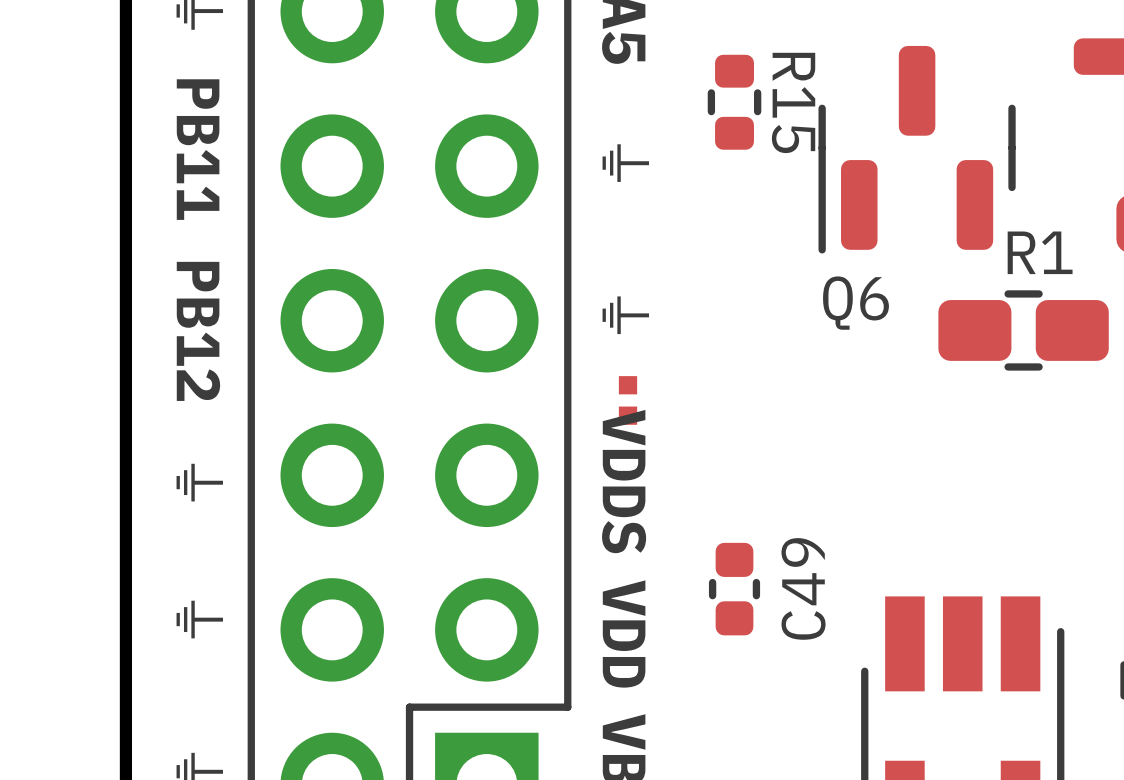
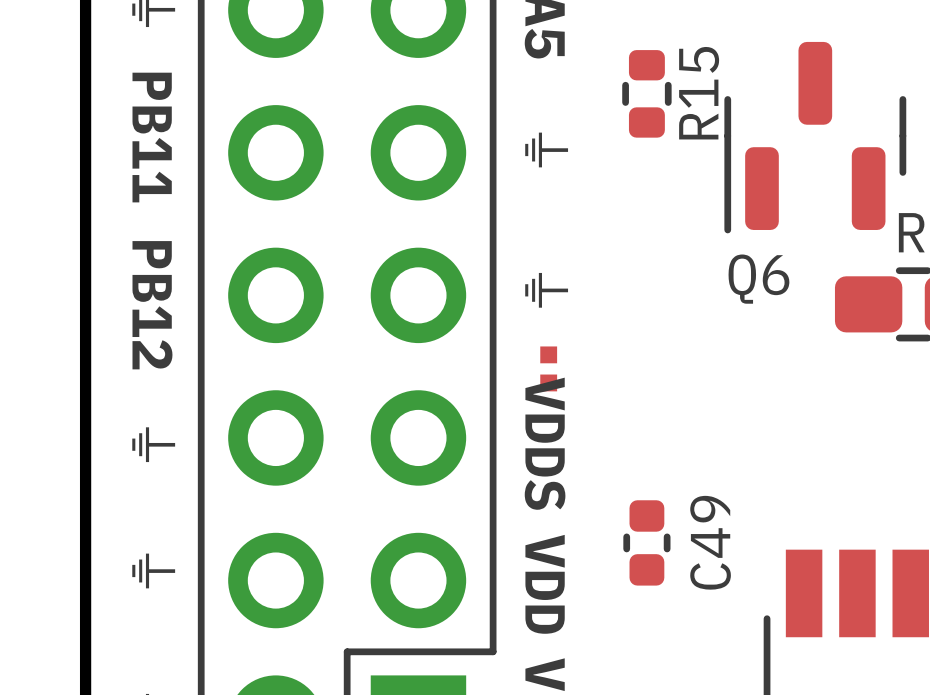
R15 name rotation: 0° (793, 102) -> 180° (699, 93)

